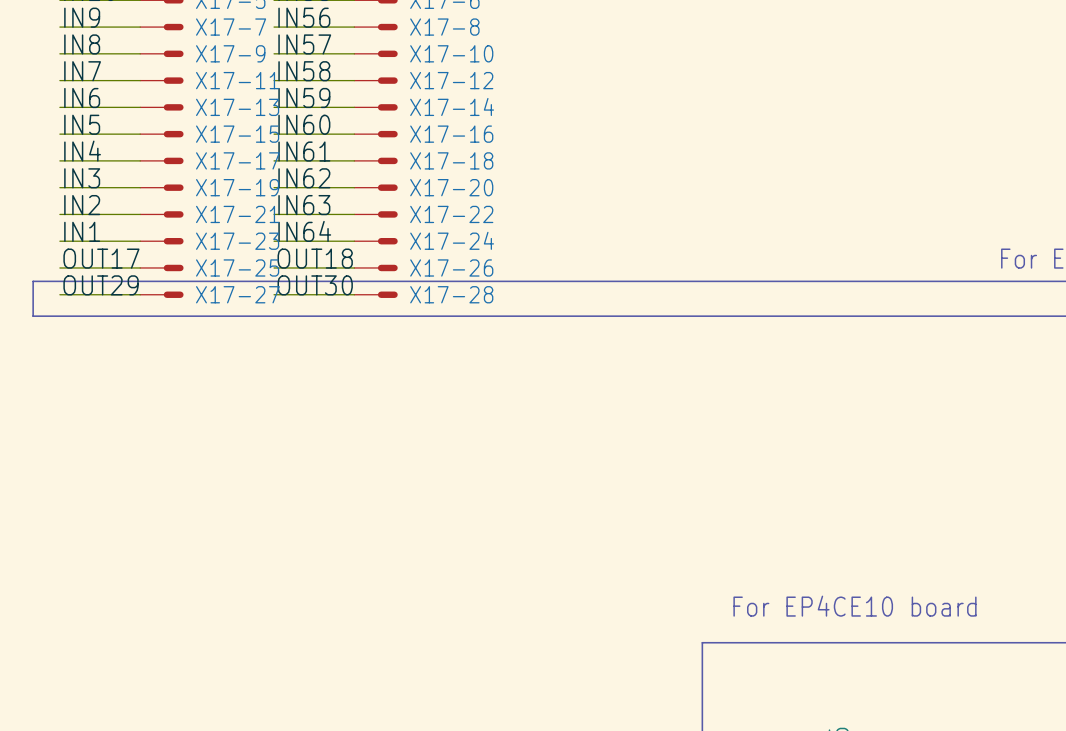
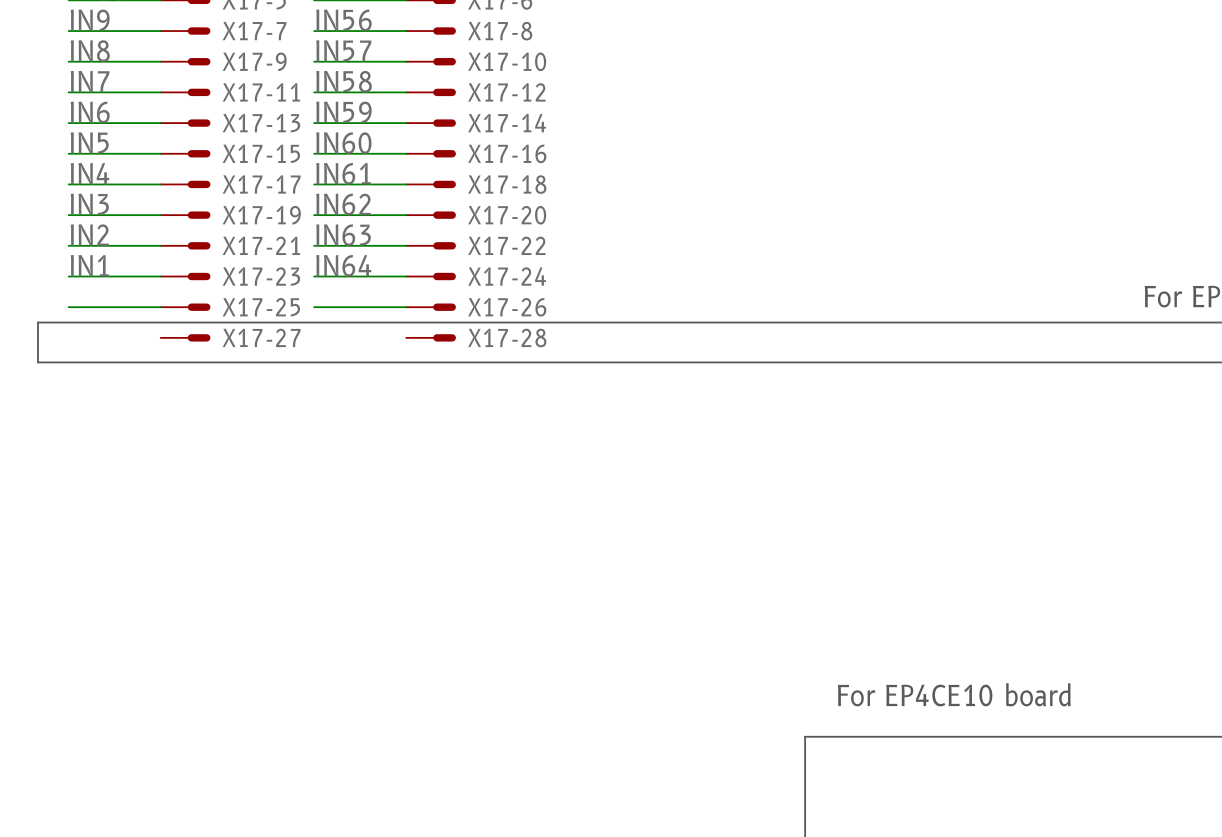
label: OUT17 (101, 258) -> none
label: OUT18 (315, 258) -> none
label: OUT29 (101, 285) -> none
label: OUT30 (315, 285) -> none
wire: (59, 294) (140, 294) -> none
wire: (274, 294) (354, 294) -> none

